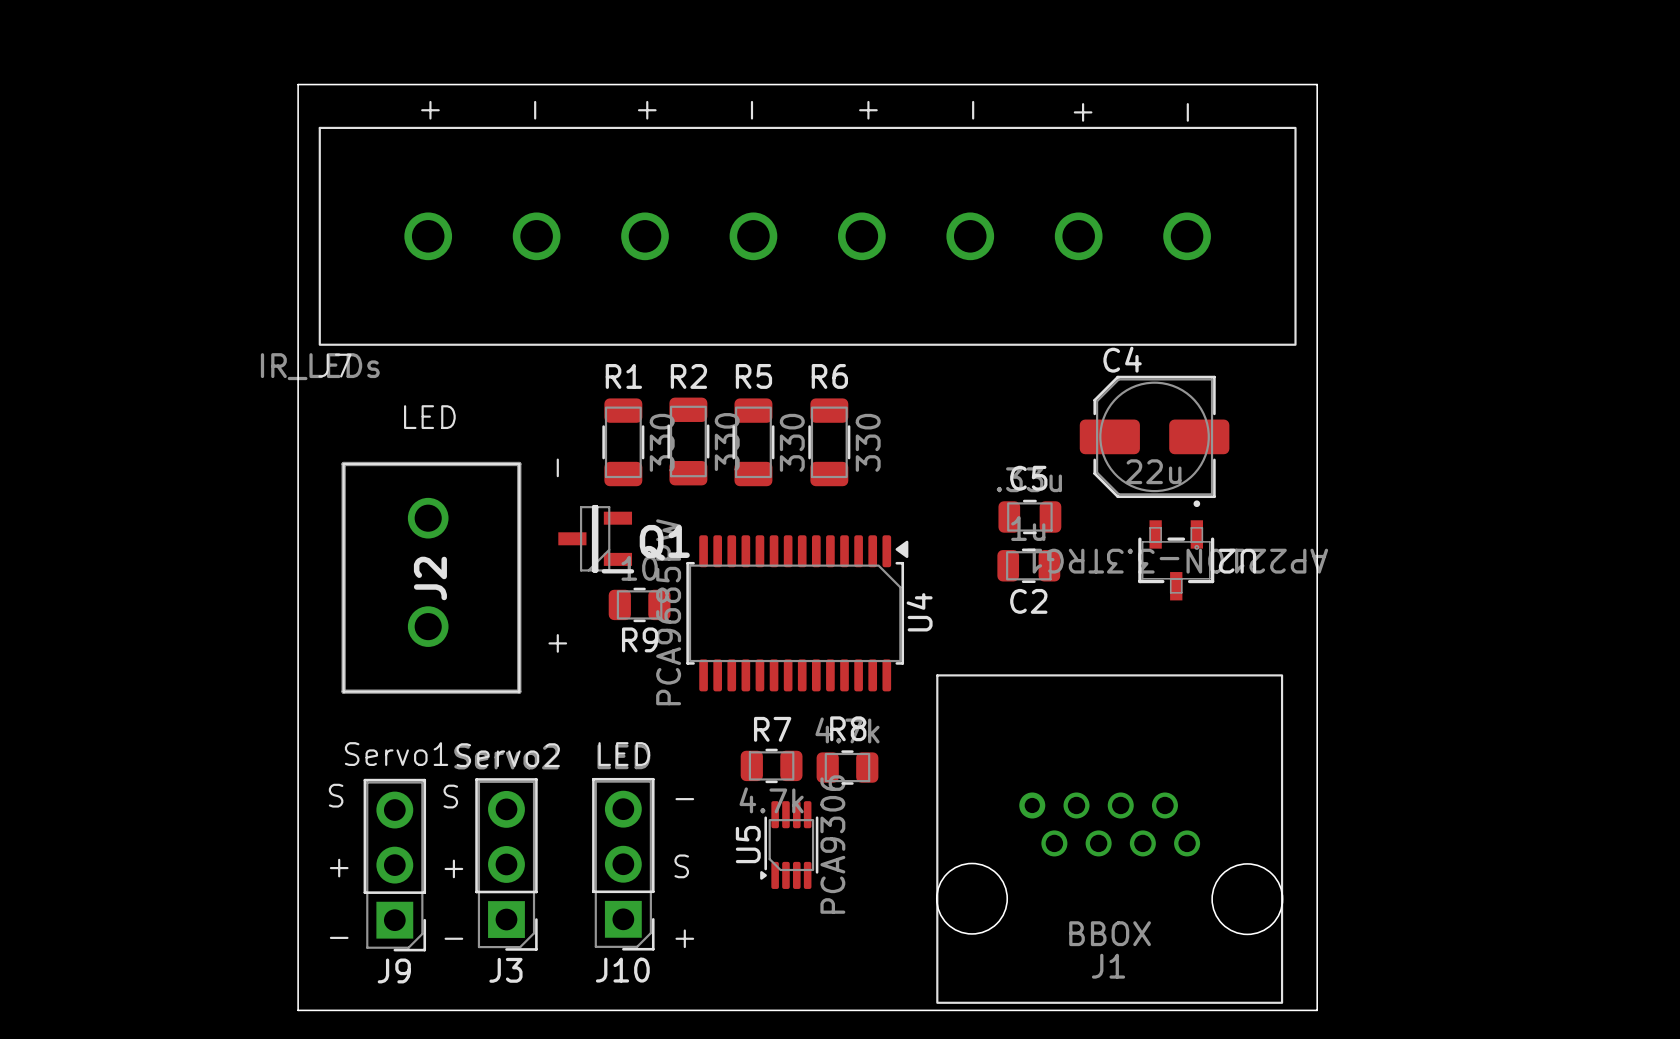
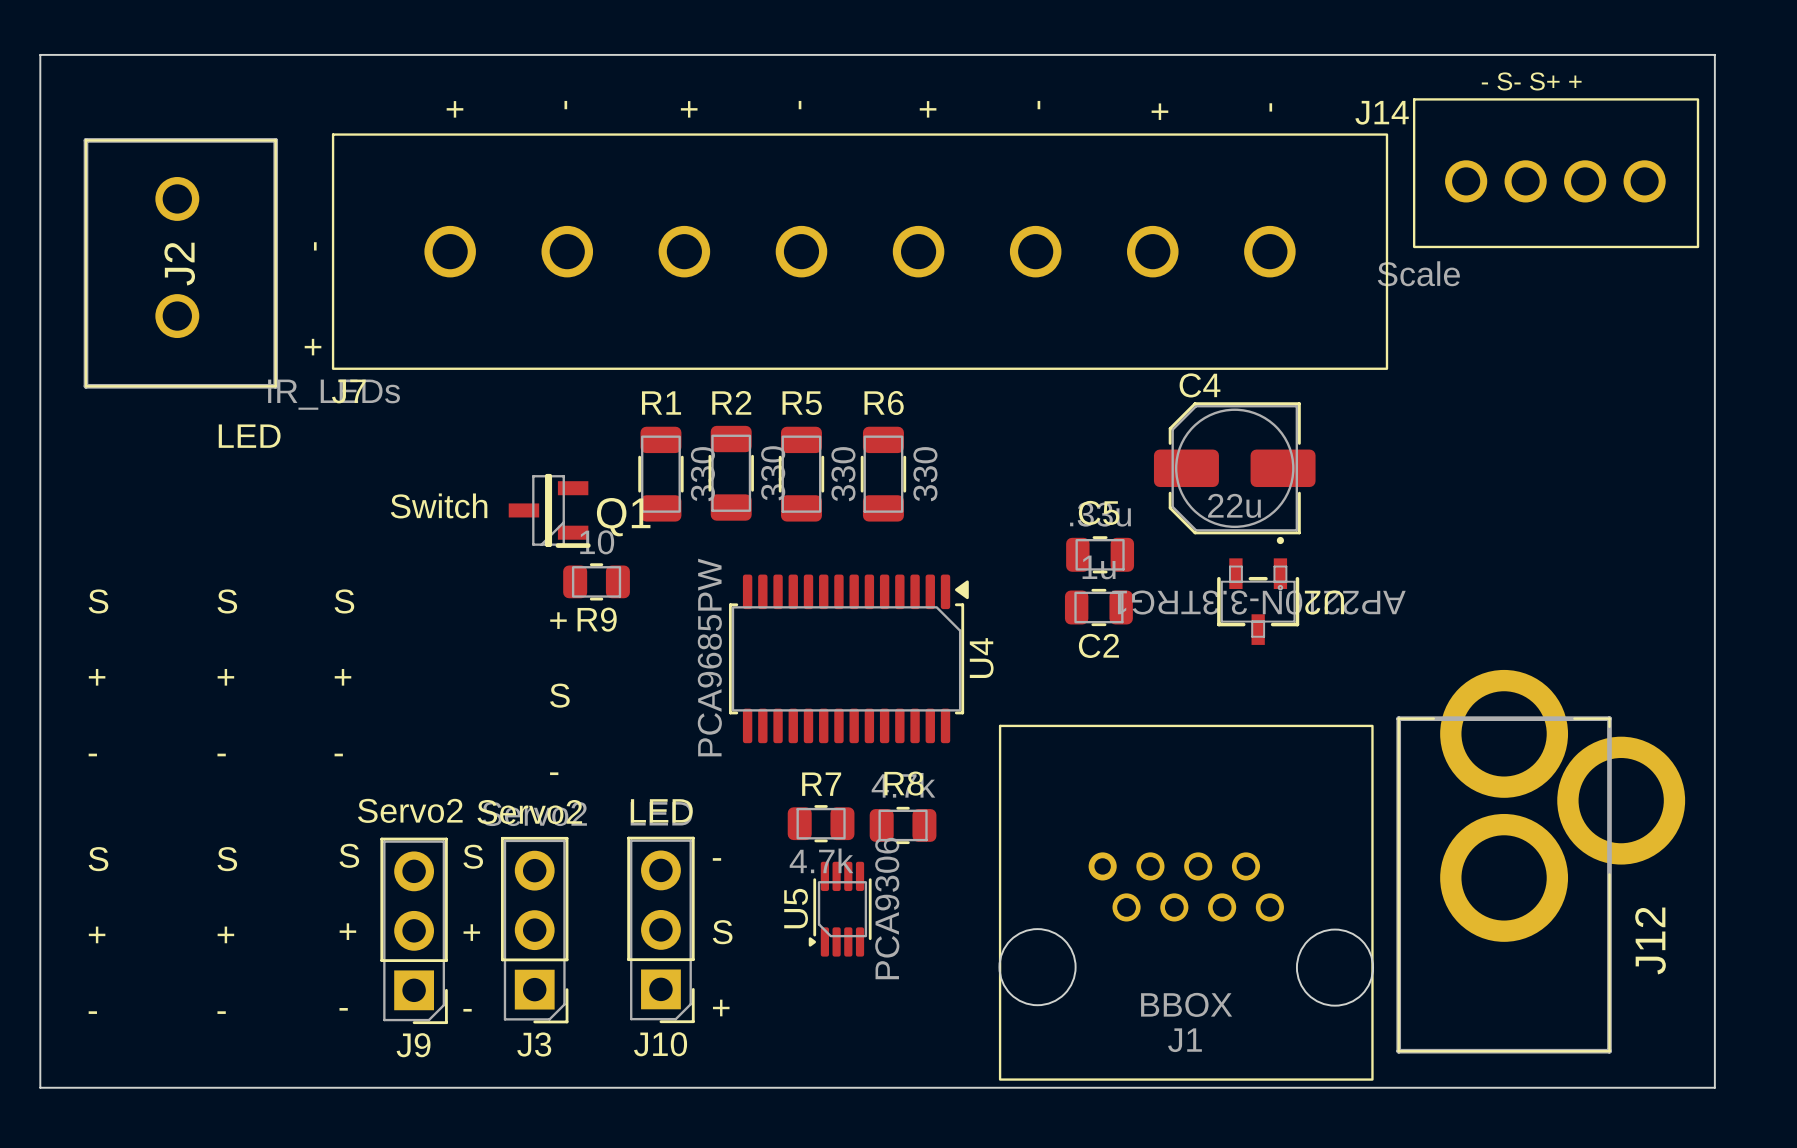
text: none -> - S- S+ + (1531, 81)
J14: none -> Scale (1556, 173)
text position: LED (429, 417) -> LED (249, 436)
text: none -> Switch (439, 505)
Q1 position: (596, 539) -> (549, 510)
text position: + - (557, 555) -> + - (313, 298)
text: none -> S (98, 601)
text: none -> S (227, 601)
text: none -> S (344, 601)
J2 position: (431, 577) -> (180, 263)
text: none -> + (558, 620)
R9 position: (639, 604) -> (596, 581)
text: none -> + (97, 677)
text: none -> + (225, 677)
text: none -> + (343, 677)
text: none -> S (559, 695)
text: none -> - (92, 754)
text: none -> - (221, 754)
text: none -> - (338, 754)
text: none -> - (554, 773)
text: Servo1 (396, 754) -> Servo2 (410, 810)
text: none -> S (98, 859)
text: none -> S (227, 859)
J12: none -> (1540, 861)
text: none -> + (97, 934)
text: none -> + (225, 934)
text: none -> - (92, 1012)
text: none -> - (221, 1012)
board edge: (298, 1010) (298, 84) (1317, 84) (1317, 1010) -> (309, 1087) (40, 1087) (40, 54) (1714, 54) (1714, 1087) (1410, 1087)

